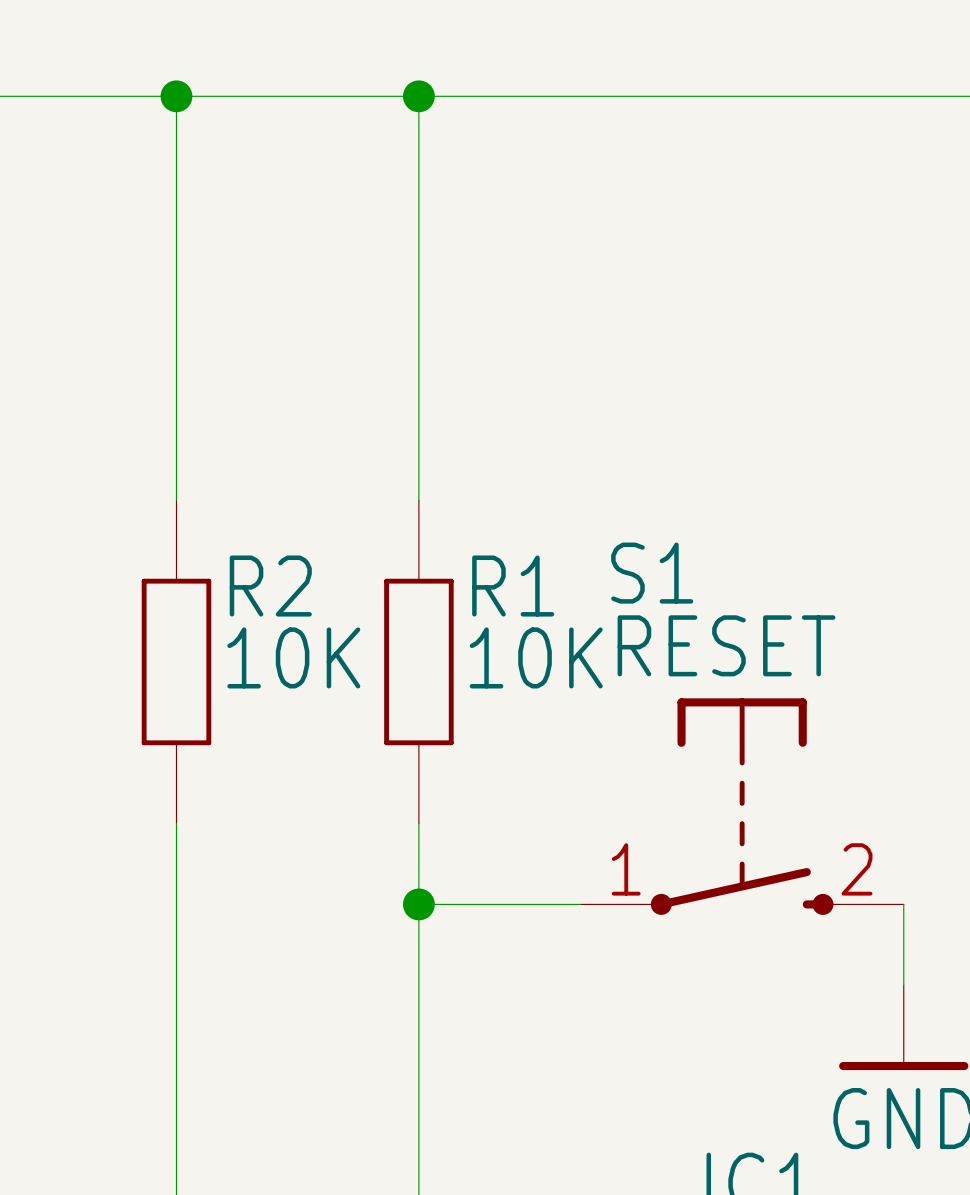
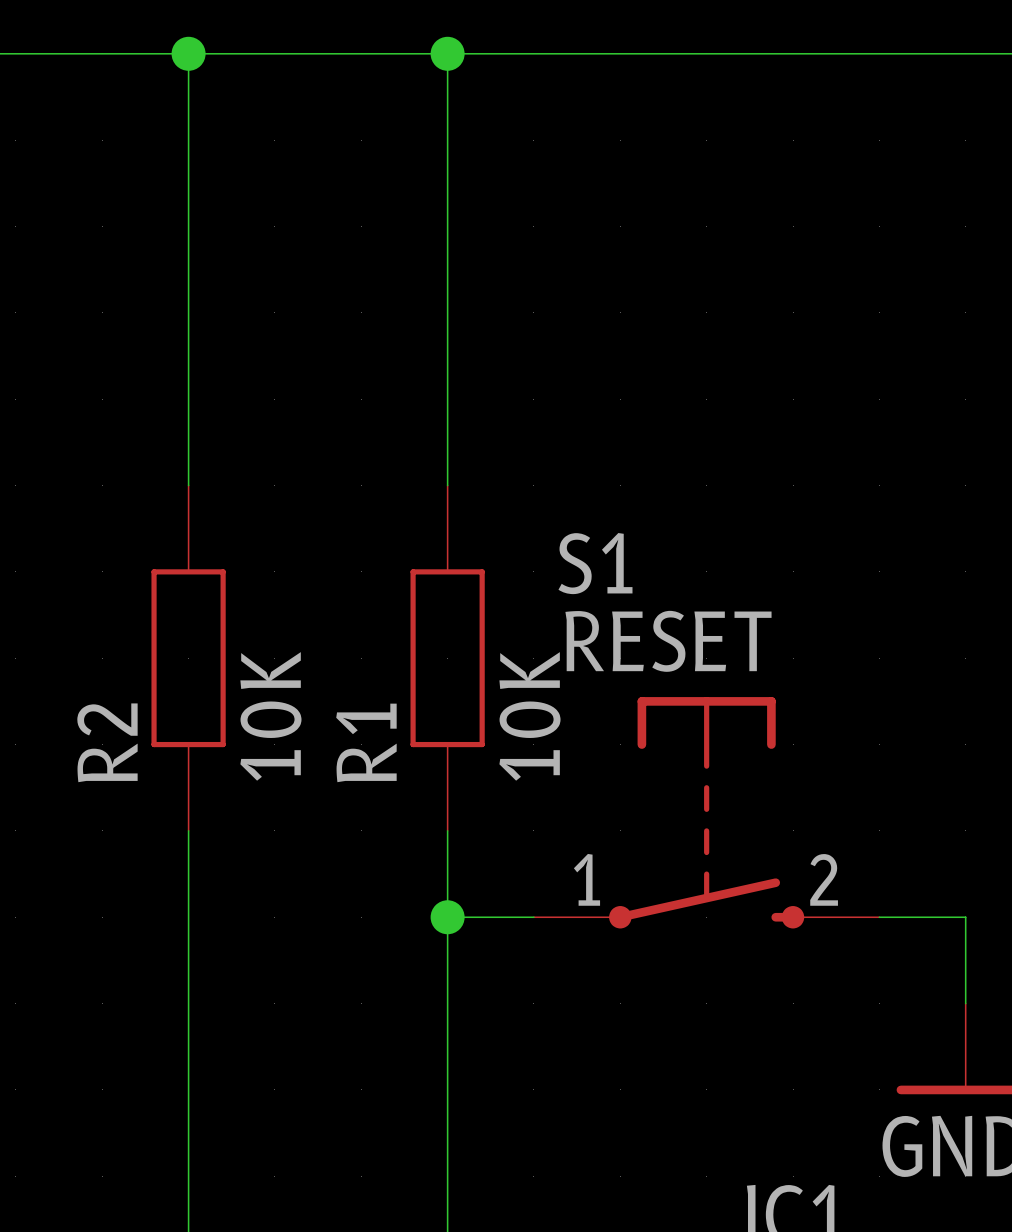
R2 name rotation: 0° (270, 586) -> 90° counterclockwise (107, 742)
R2 name position: R2 (270, 586) -> R2 (107, 742)
R1 name rotation: 0° (513, 586) -> 90° counterclockwise (366, 742)
R1 name position: R1 (513, 586) -> R1 (366, 742)
R2 value rotation: 0° (293, 657) -> 90° counterclockwise (270, 716)
R1 value rotation: 0° (536, 657) -> 90° counterclockwise (529, 716)
S1 position: (742, 806) -> (706, 812)

